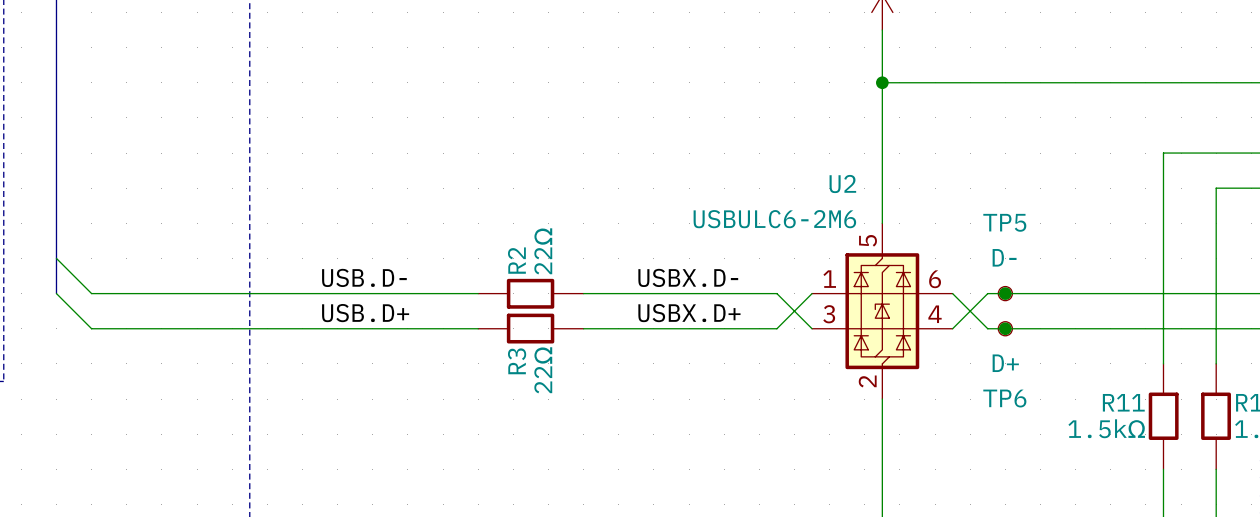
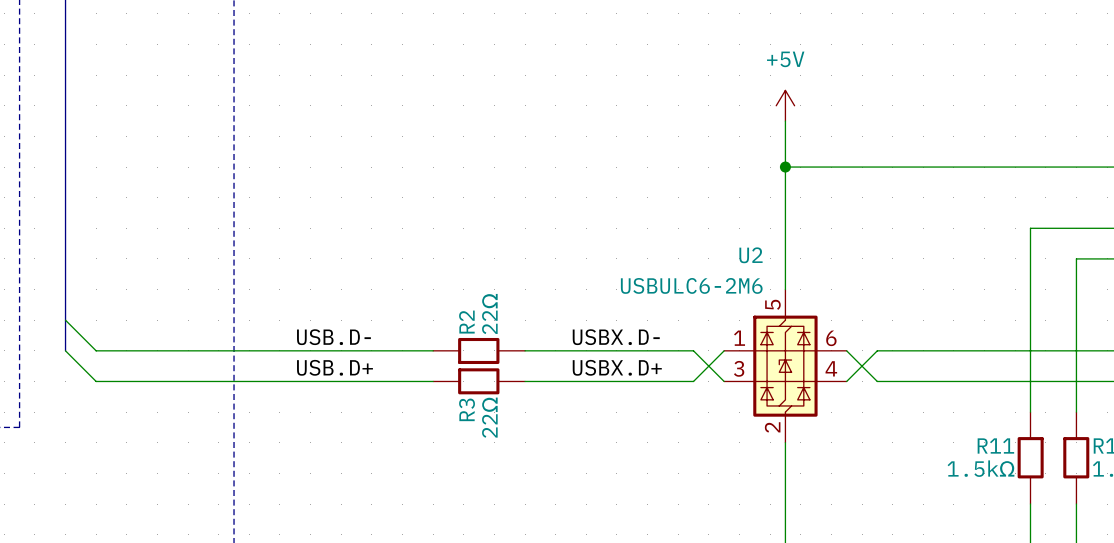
junction: (1005, 293) -> none
TP5: D- (1005, 293) -> none
junction: (1005, 328) -> none
TP6: D+ (1005, 328) -> none

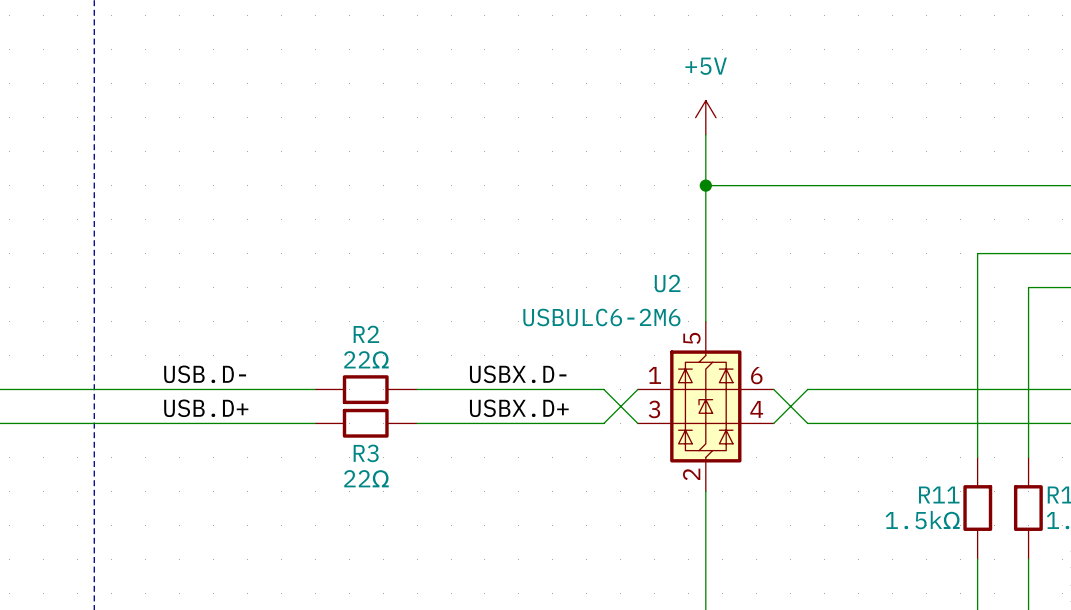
R2 value rotation: 0° (489, 314) -> 90° clockwise (366, 359)
R2 name rotation: 0° (466, 322) -> 90° clockwise (366, 334)
R3 name rotation: 0° (467, 409) -> 90° clockwise (366, 453)
R3 value rotation: 0° (489, 417) -> 90° clockwise (366, 478)

